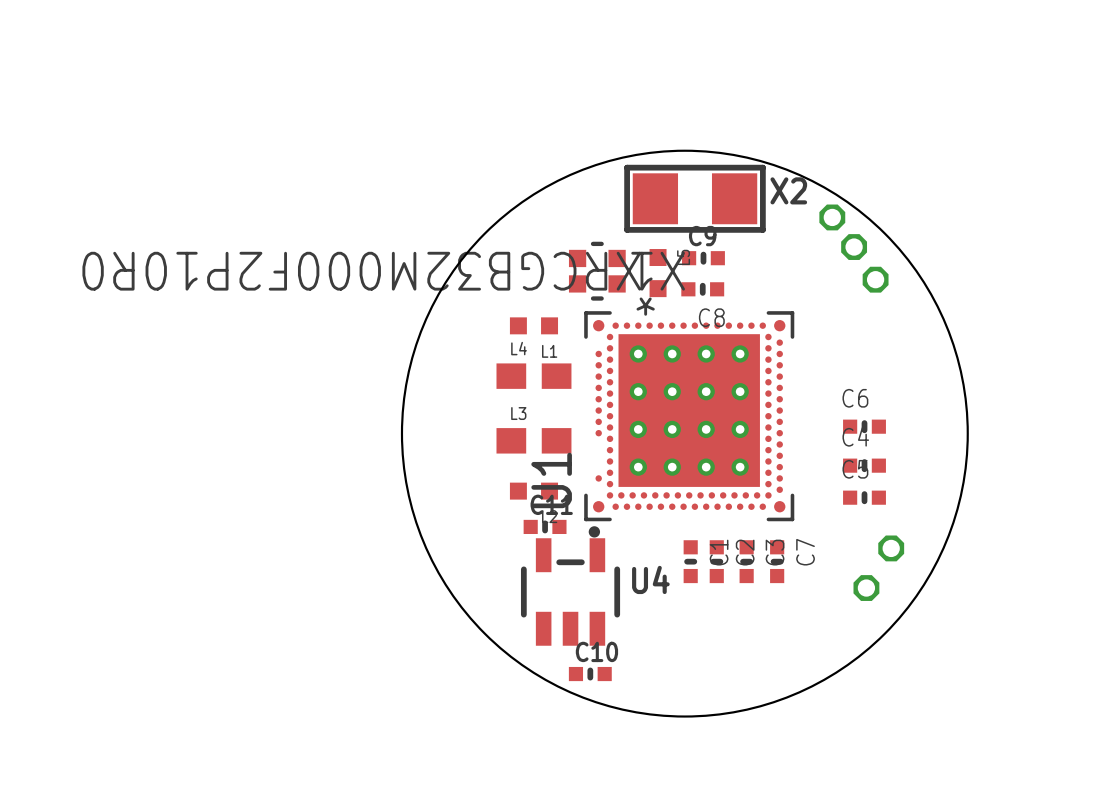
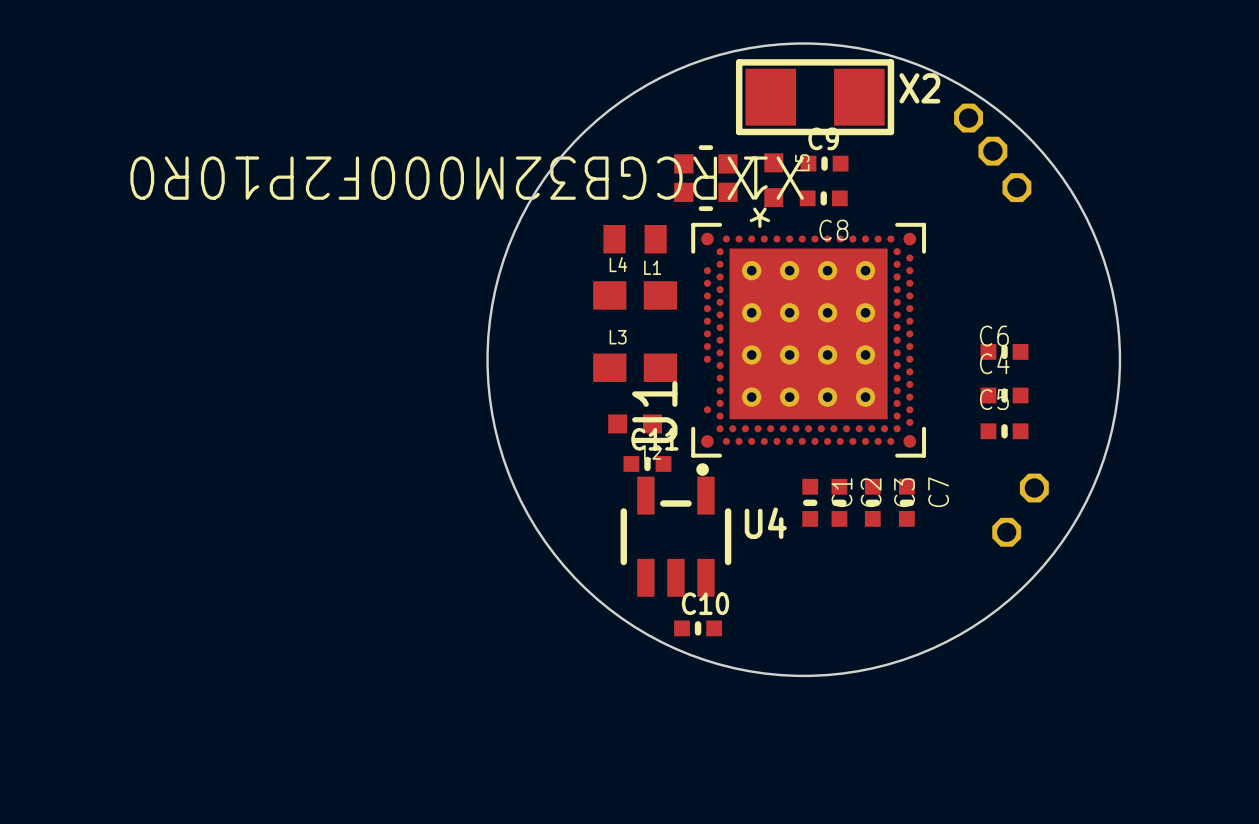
L1 footprint: [509, 317, 559, 335] -> [603, 225, 667, 254]
C6 name position: C6 (855, 398) -> C6 (994, 336)

